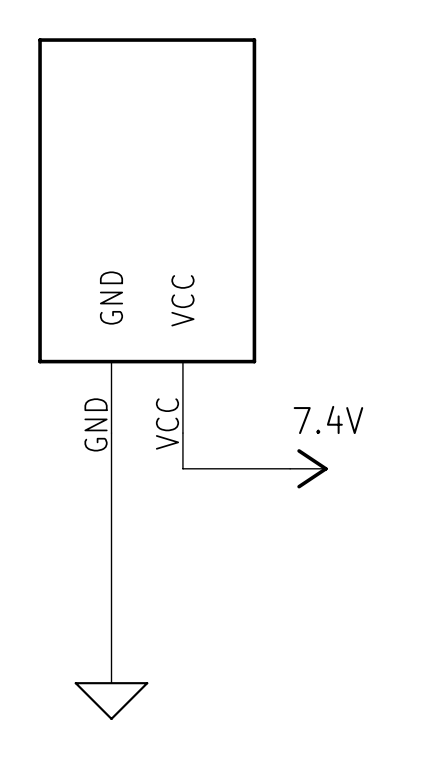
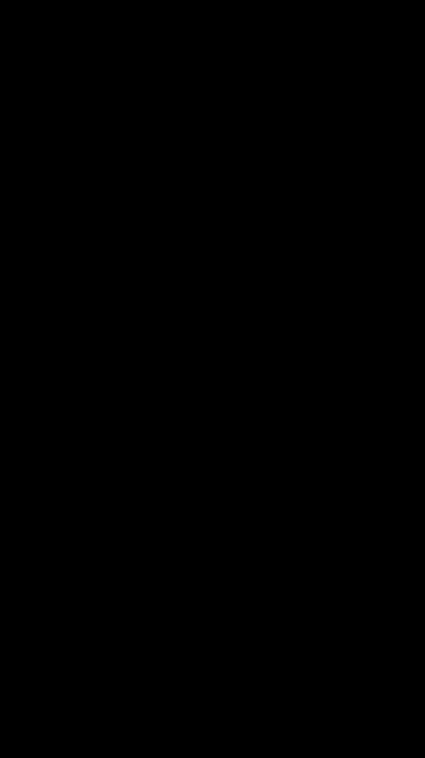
part: (147, 235) -> none
wire: (111, 433) (111, 683) -> none
wire: (182, 433) (182, 468) (290, 468) -> none
power symbol: 7.4V (308, 468) -> none
power symbol: (111, 701) -> none

